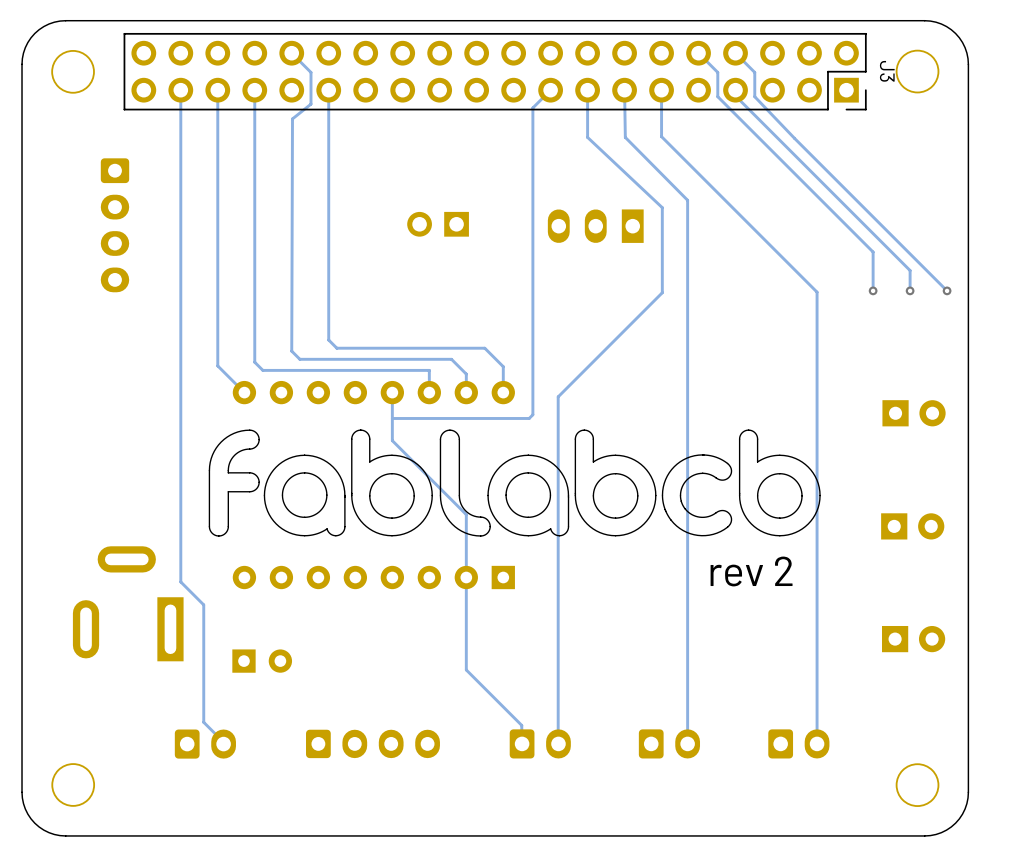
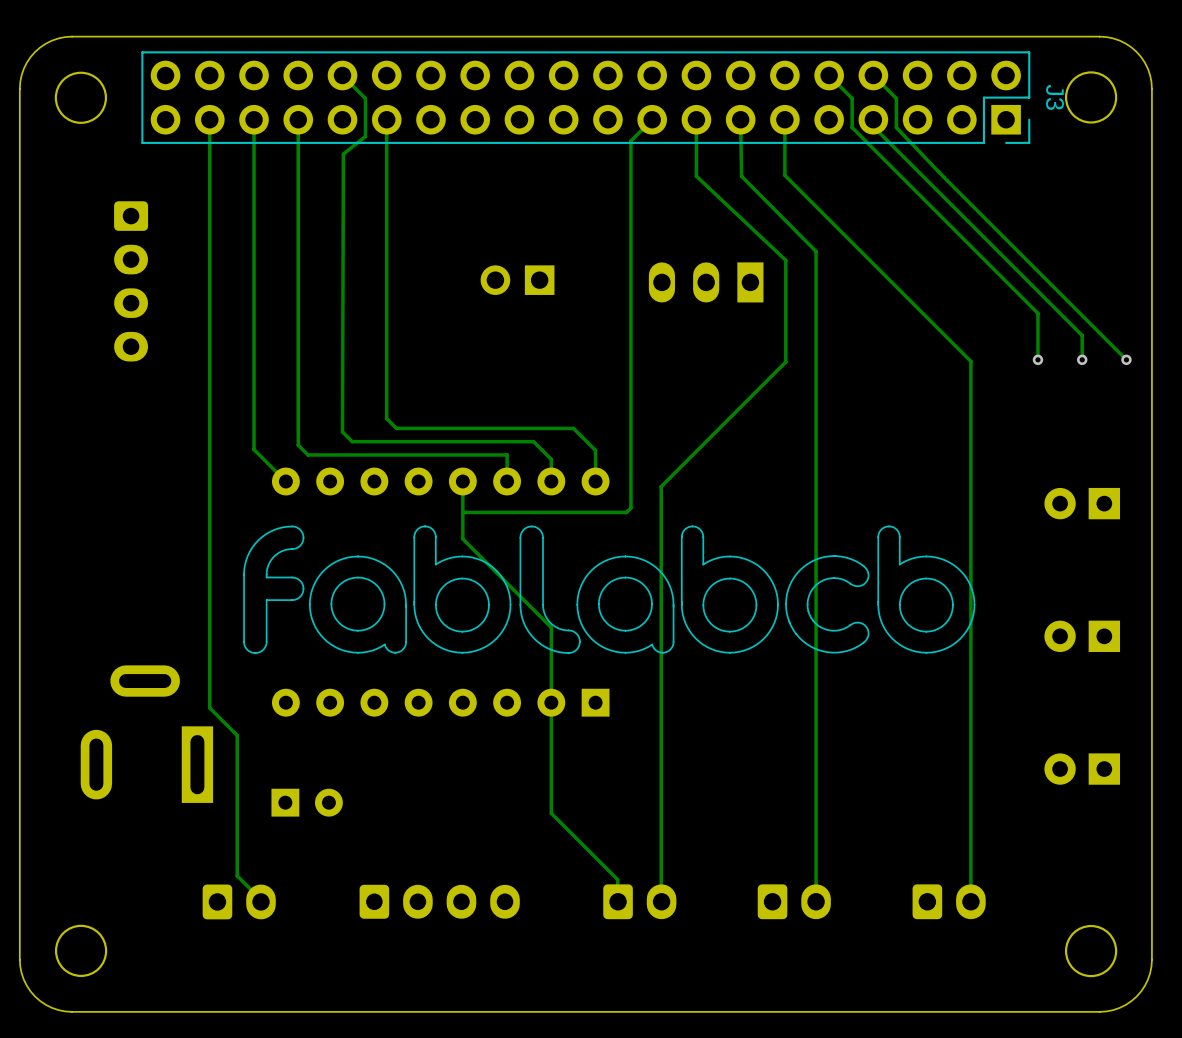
part rotation: 0° (914, 413) -> 180° (1082, 503)
part rotation: 0° (912, 526) -> 180° (1082, 636)
text: rev 2 (751, 571) -> none
part rotation: 0° (913, 639) -> 180° (1082, 769)

